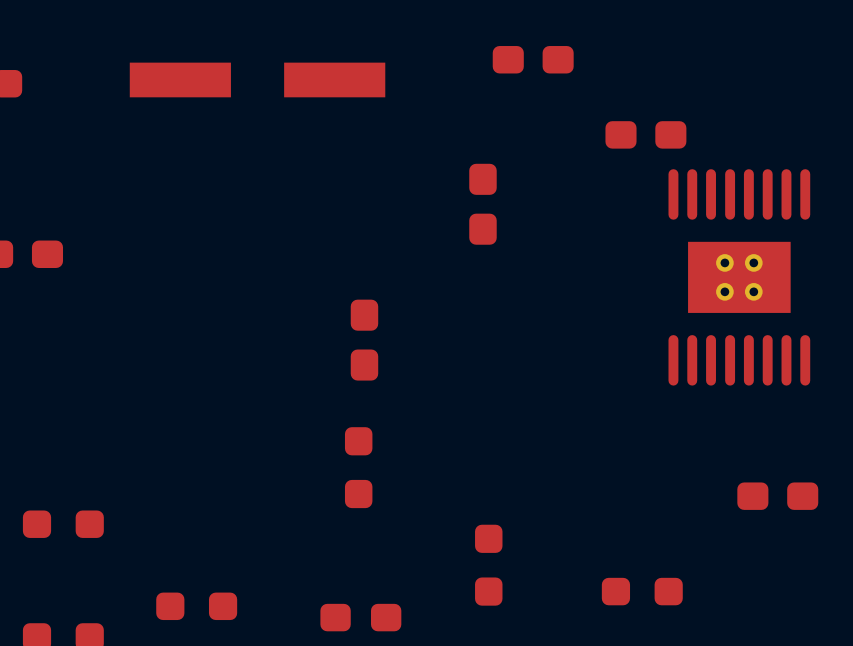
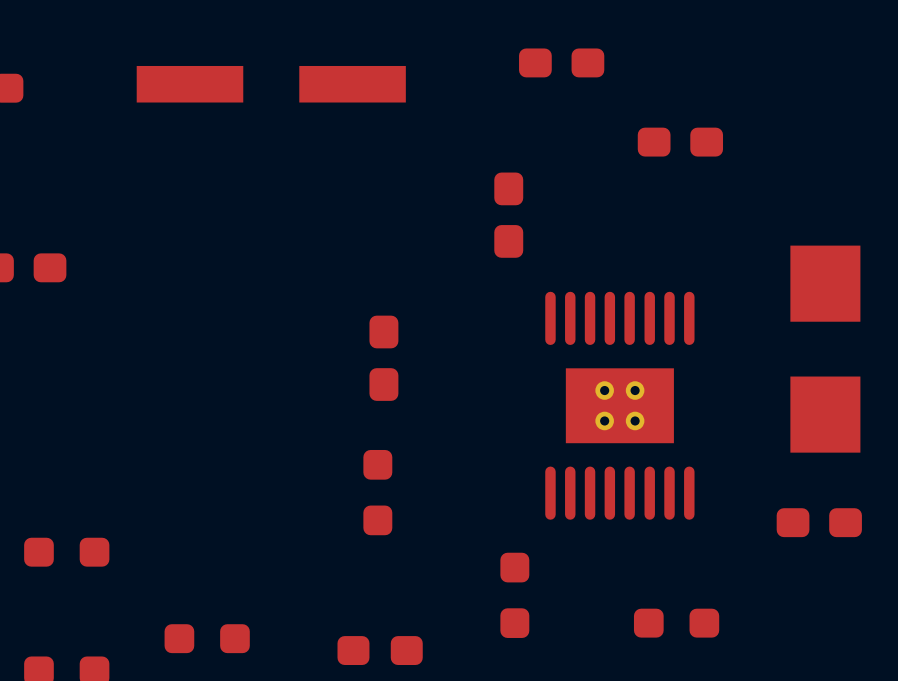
part position: (739, 277) -> (619, 405)
part: none -> (825, 349)

